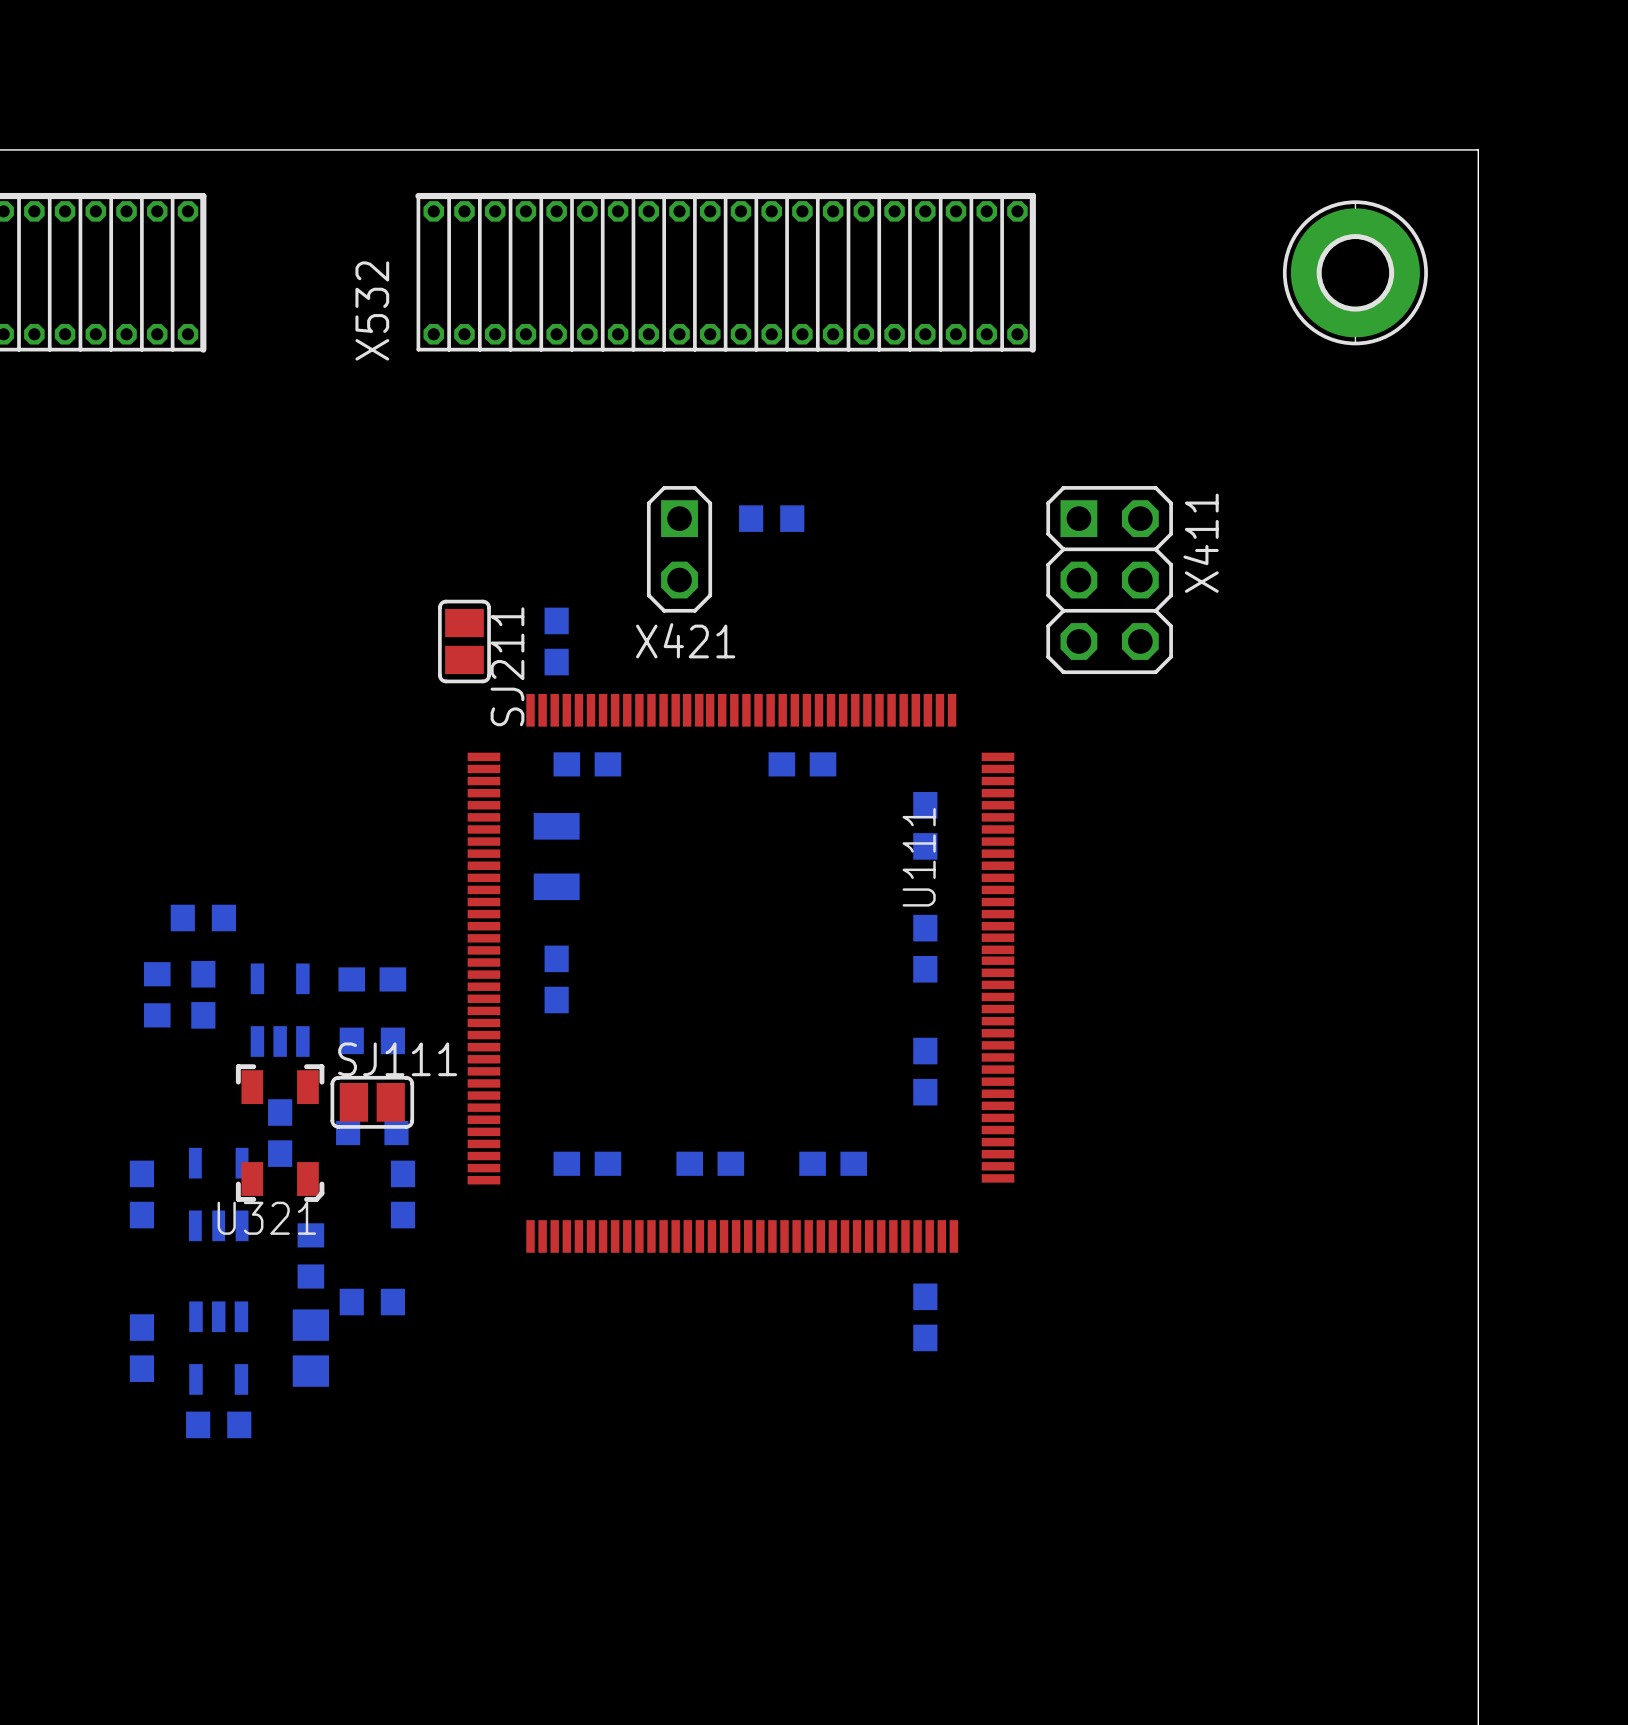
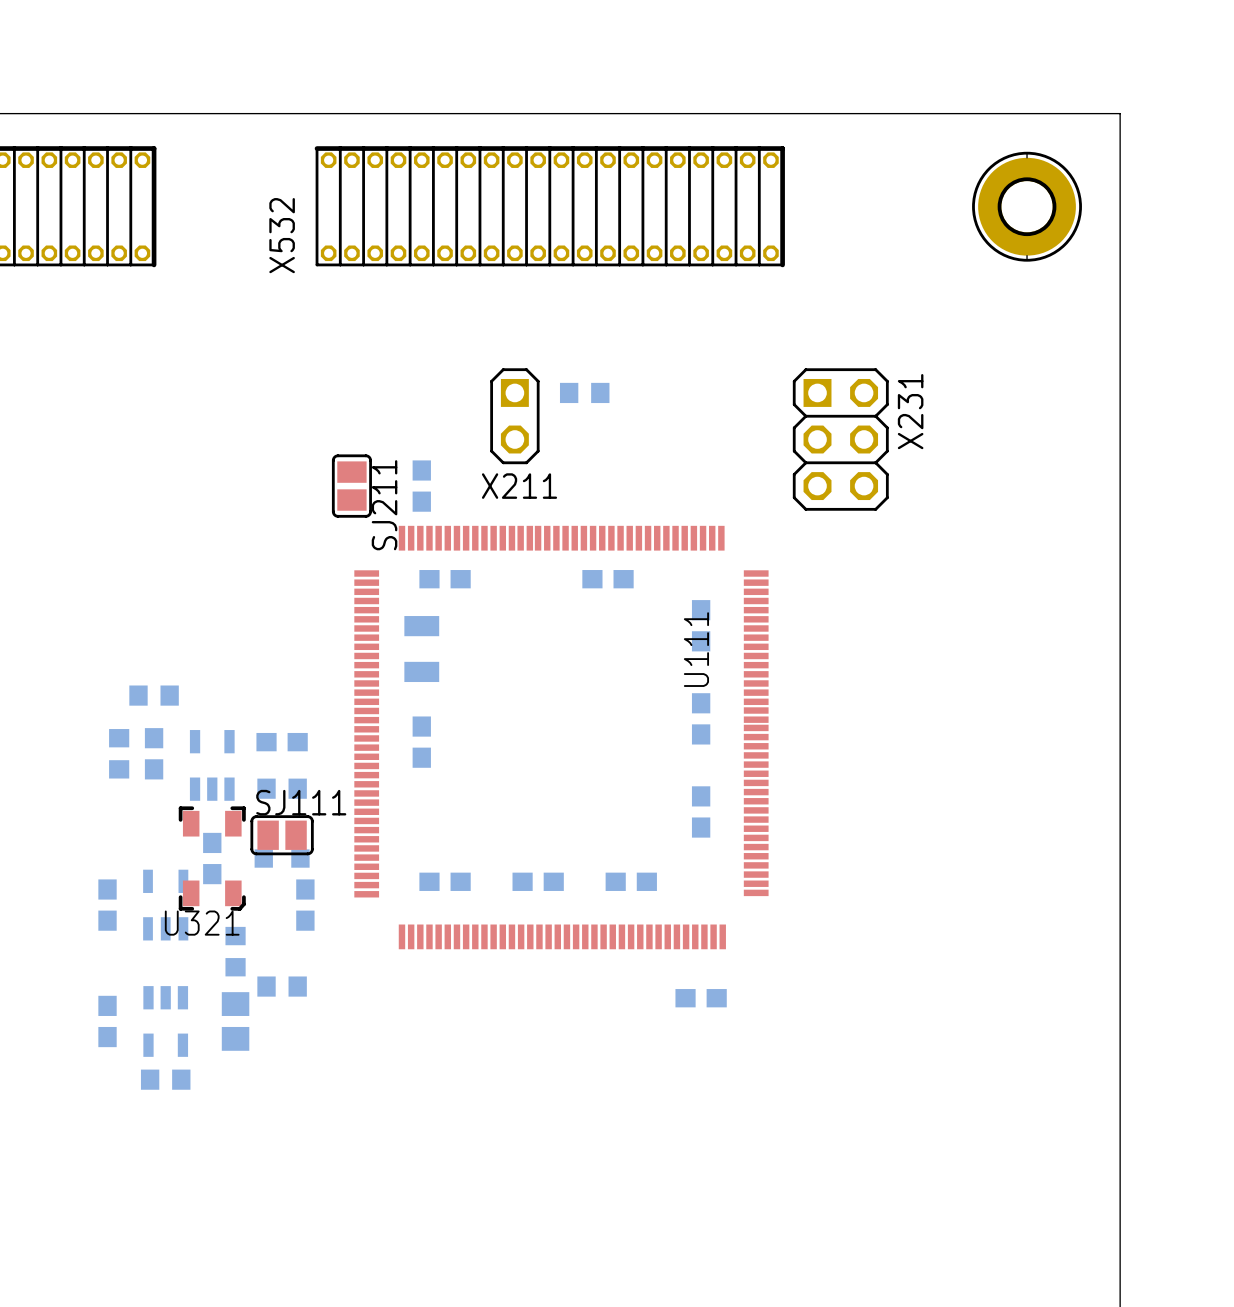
X411 name: X411 (1201, 543) -> X231 (910, 411)
X421 name: X421 (685, 640) -> X211 (519, 486)
part rotation: 0° (925, 1317) -> 90° clockwise (701, 998)

